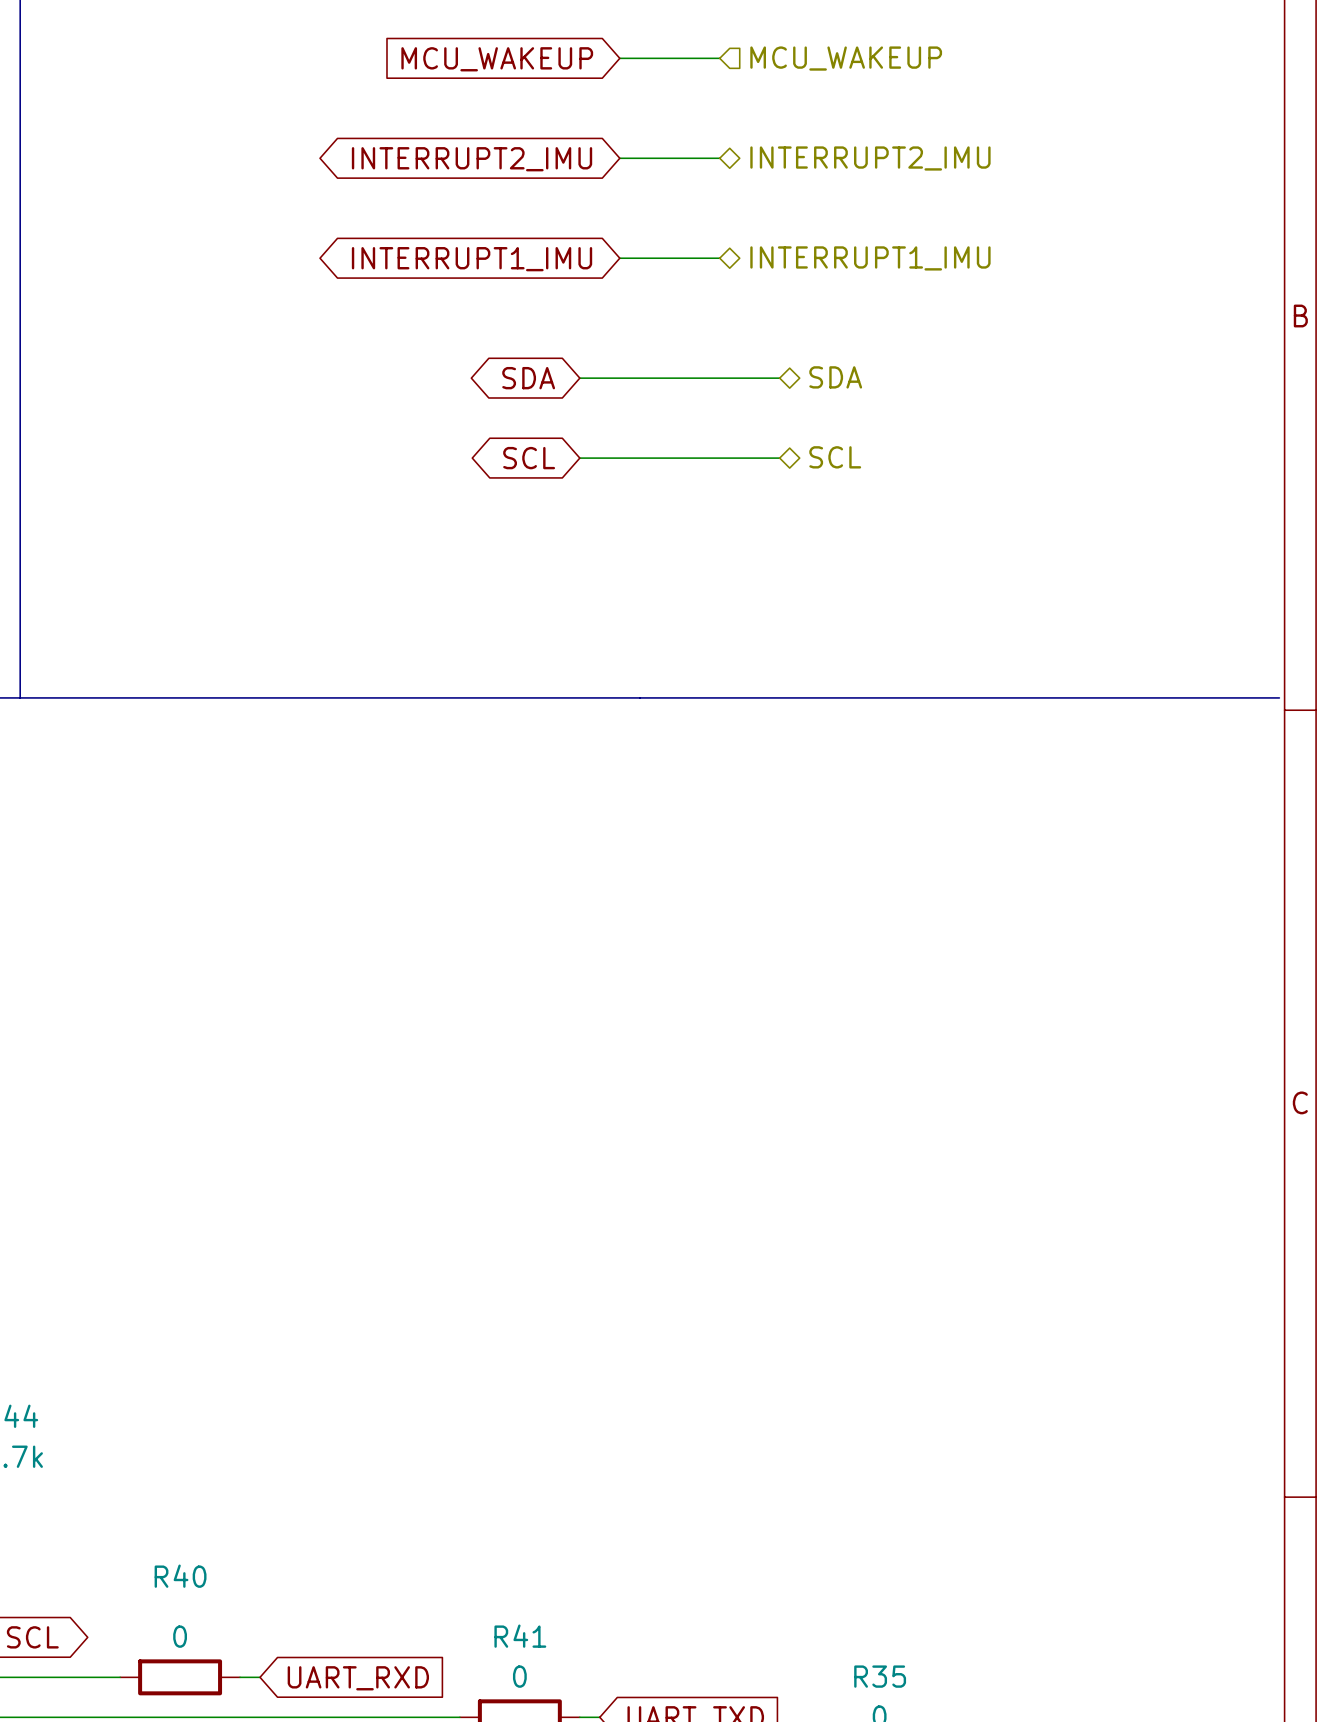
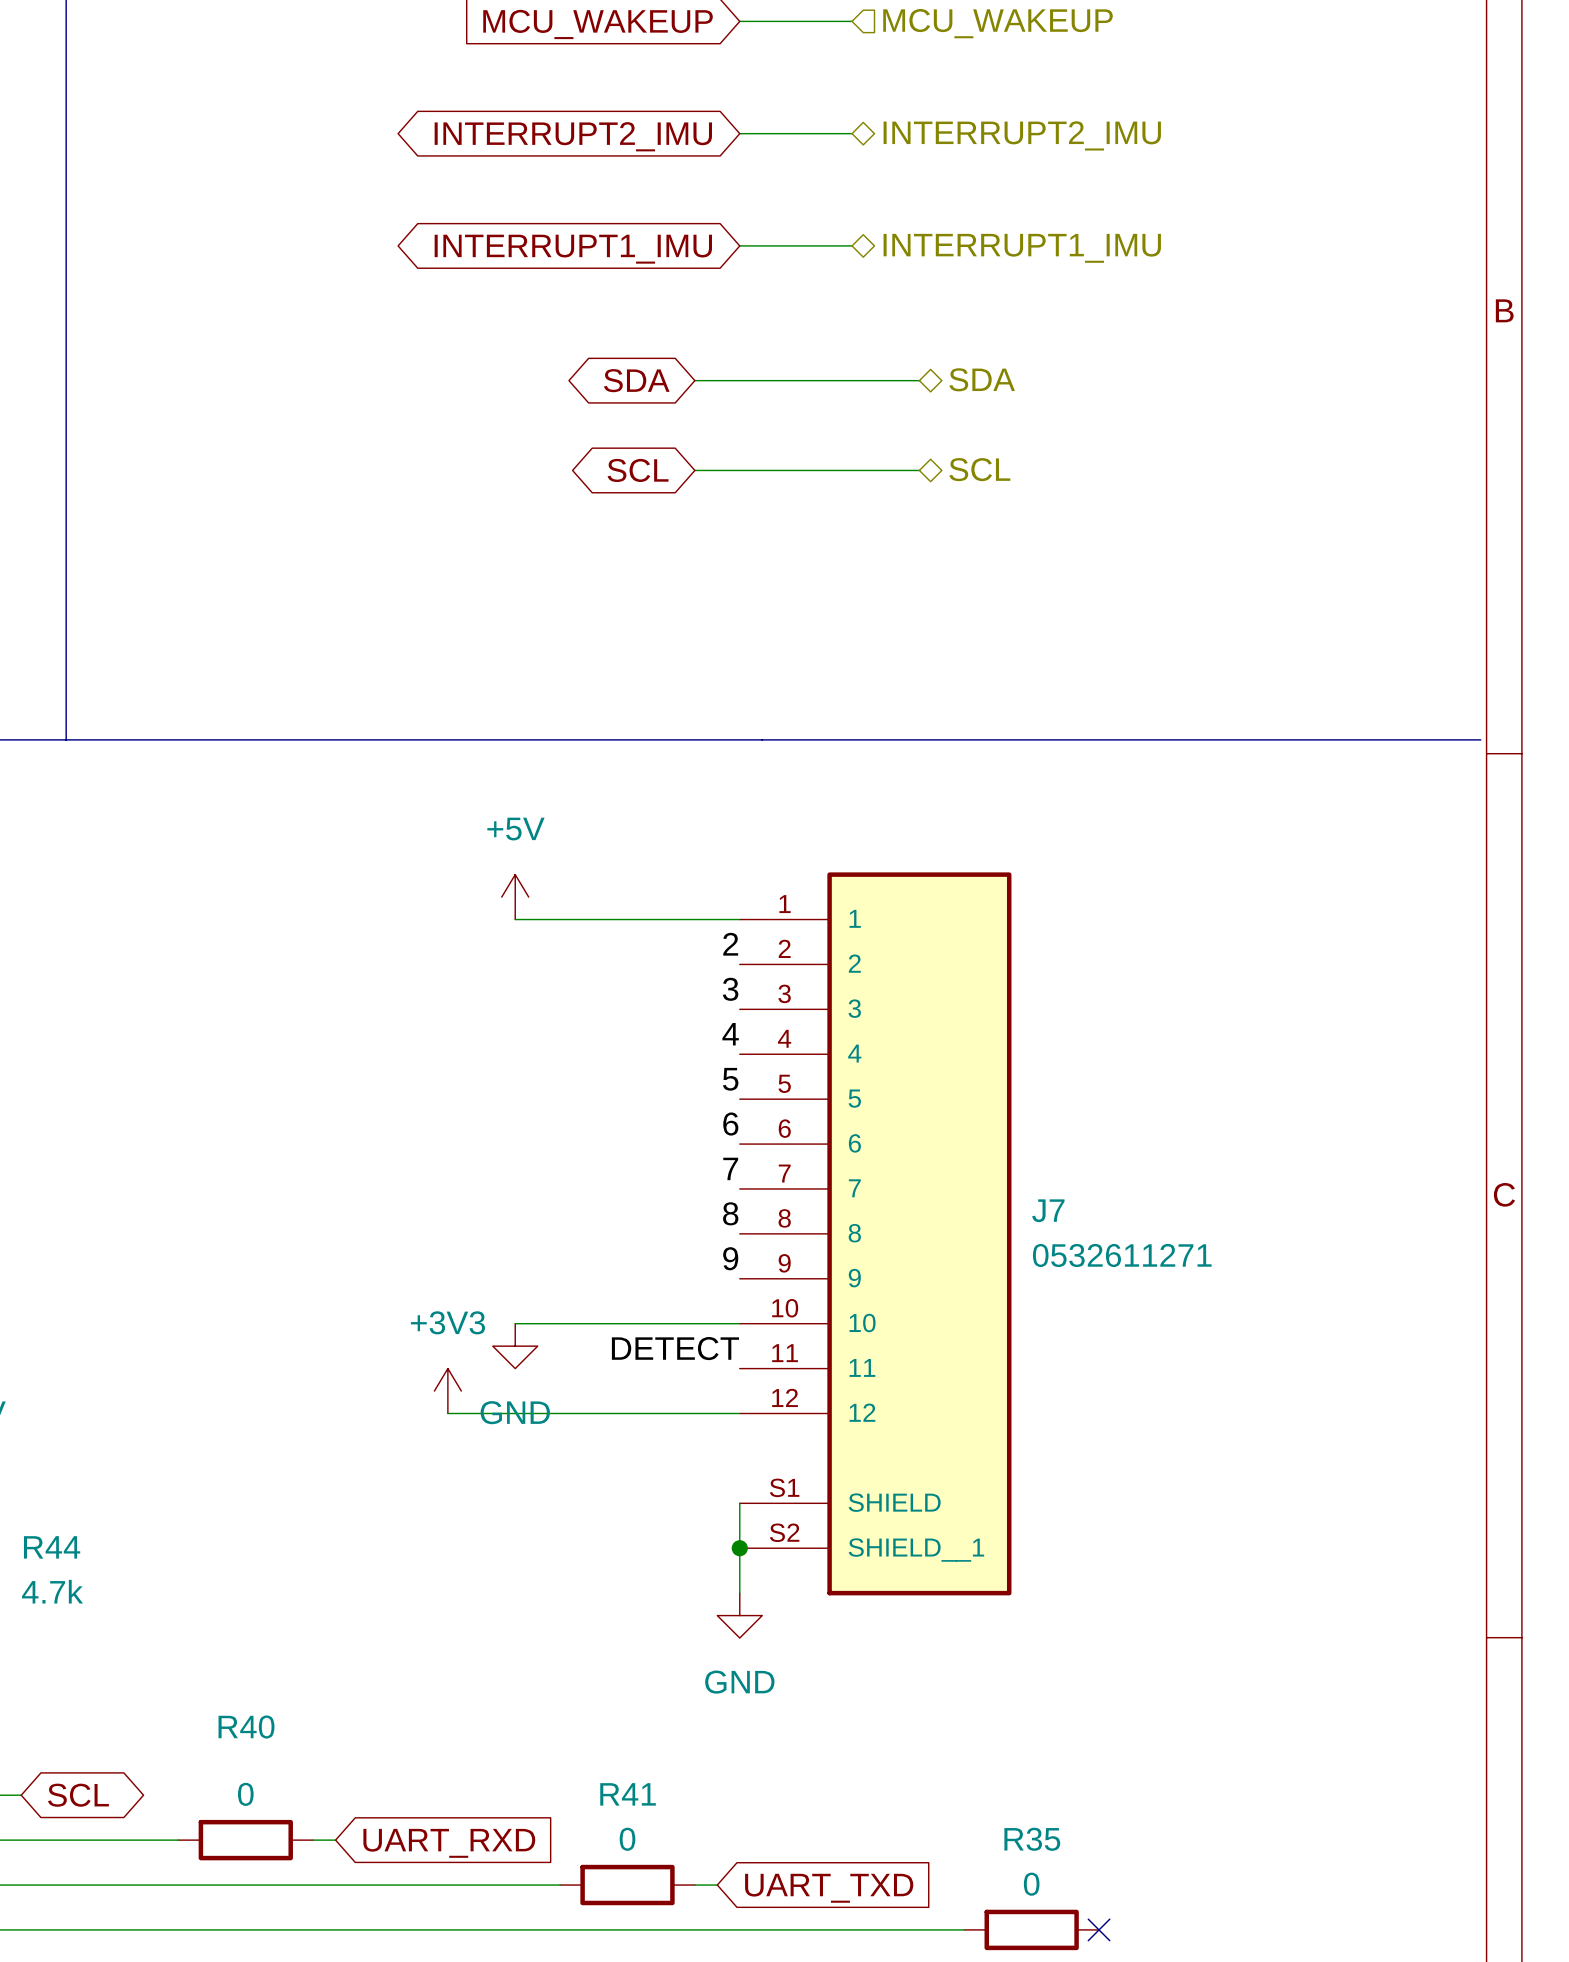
power symbol: none -> +5V (515, 897)
wire: none -> (515, 919) (739, 919)
label: none -> 2 (730, 944)
label: none -> 3 (730, 989)
label: none -> 4 (730, 1034)
label: none -> 5 (730, 1079)
label: none -> 6 (730, 1124)
label: none -> 7 (730, 1168)
label: none -> 8 (730, 1213)
J7: none -> 0532611271 (875, 1233)
label: none -> 9 (730, 1258)
wire: none -> (515, 1323) (739, 1323)
power symbol: none -> GND (515, 1346)
label: none -> DETECT (675, 1348)
power symbol: none -> +3V3 (447, 1391)
wire: none -> (447, 1413) (739, 1413)
wire: none -> (739, 1503) (739, 1593)
junction: none -> (739, 1548)
power symbol: none -> GND (739, 1615)

